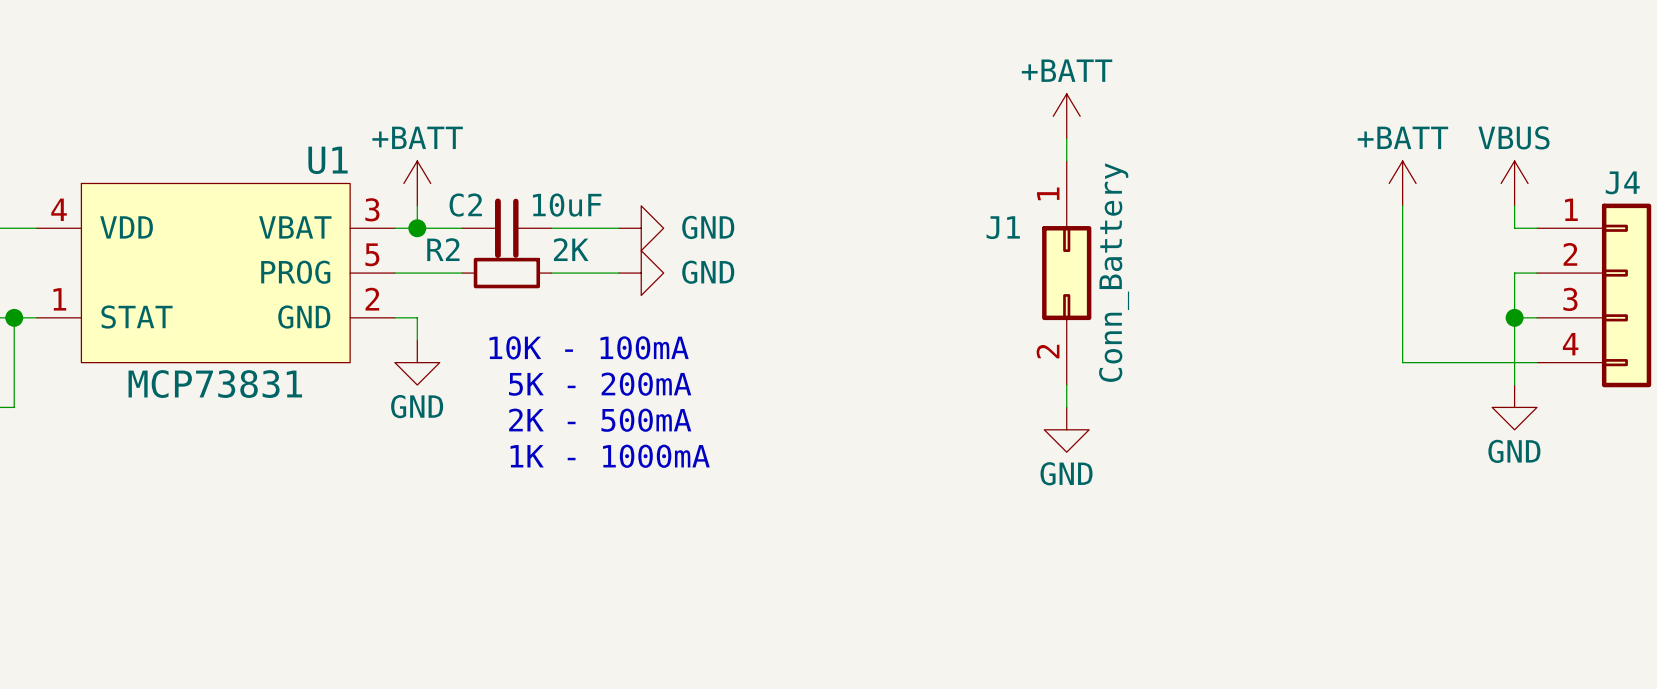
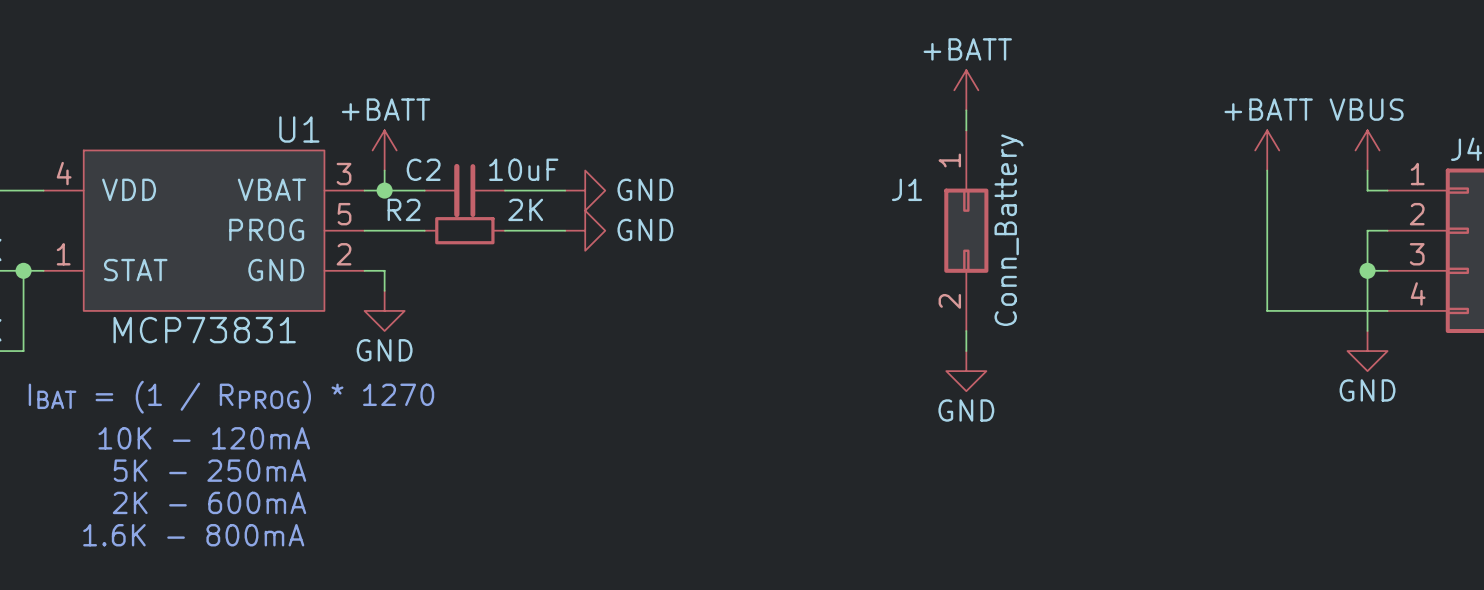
text: 10K - 100mA (589, 347) -> none
text: 5K - 200mA (600, 384) -> none
text: 2K - 500mA (600, 420) -> none
text: 1K - 1000mA (610, 456) -> none
text: none -> IBAT = (1 / RPROG) * 1270 (231, 397)
text: none -> 10K - 120mA (204, 438)
text: none -> 5K - 250mA (209, 470)
text: none -> 2K - 600mA (209, 502)
text: none -> 1.6K - 800mA (193, 535)

